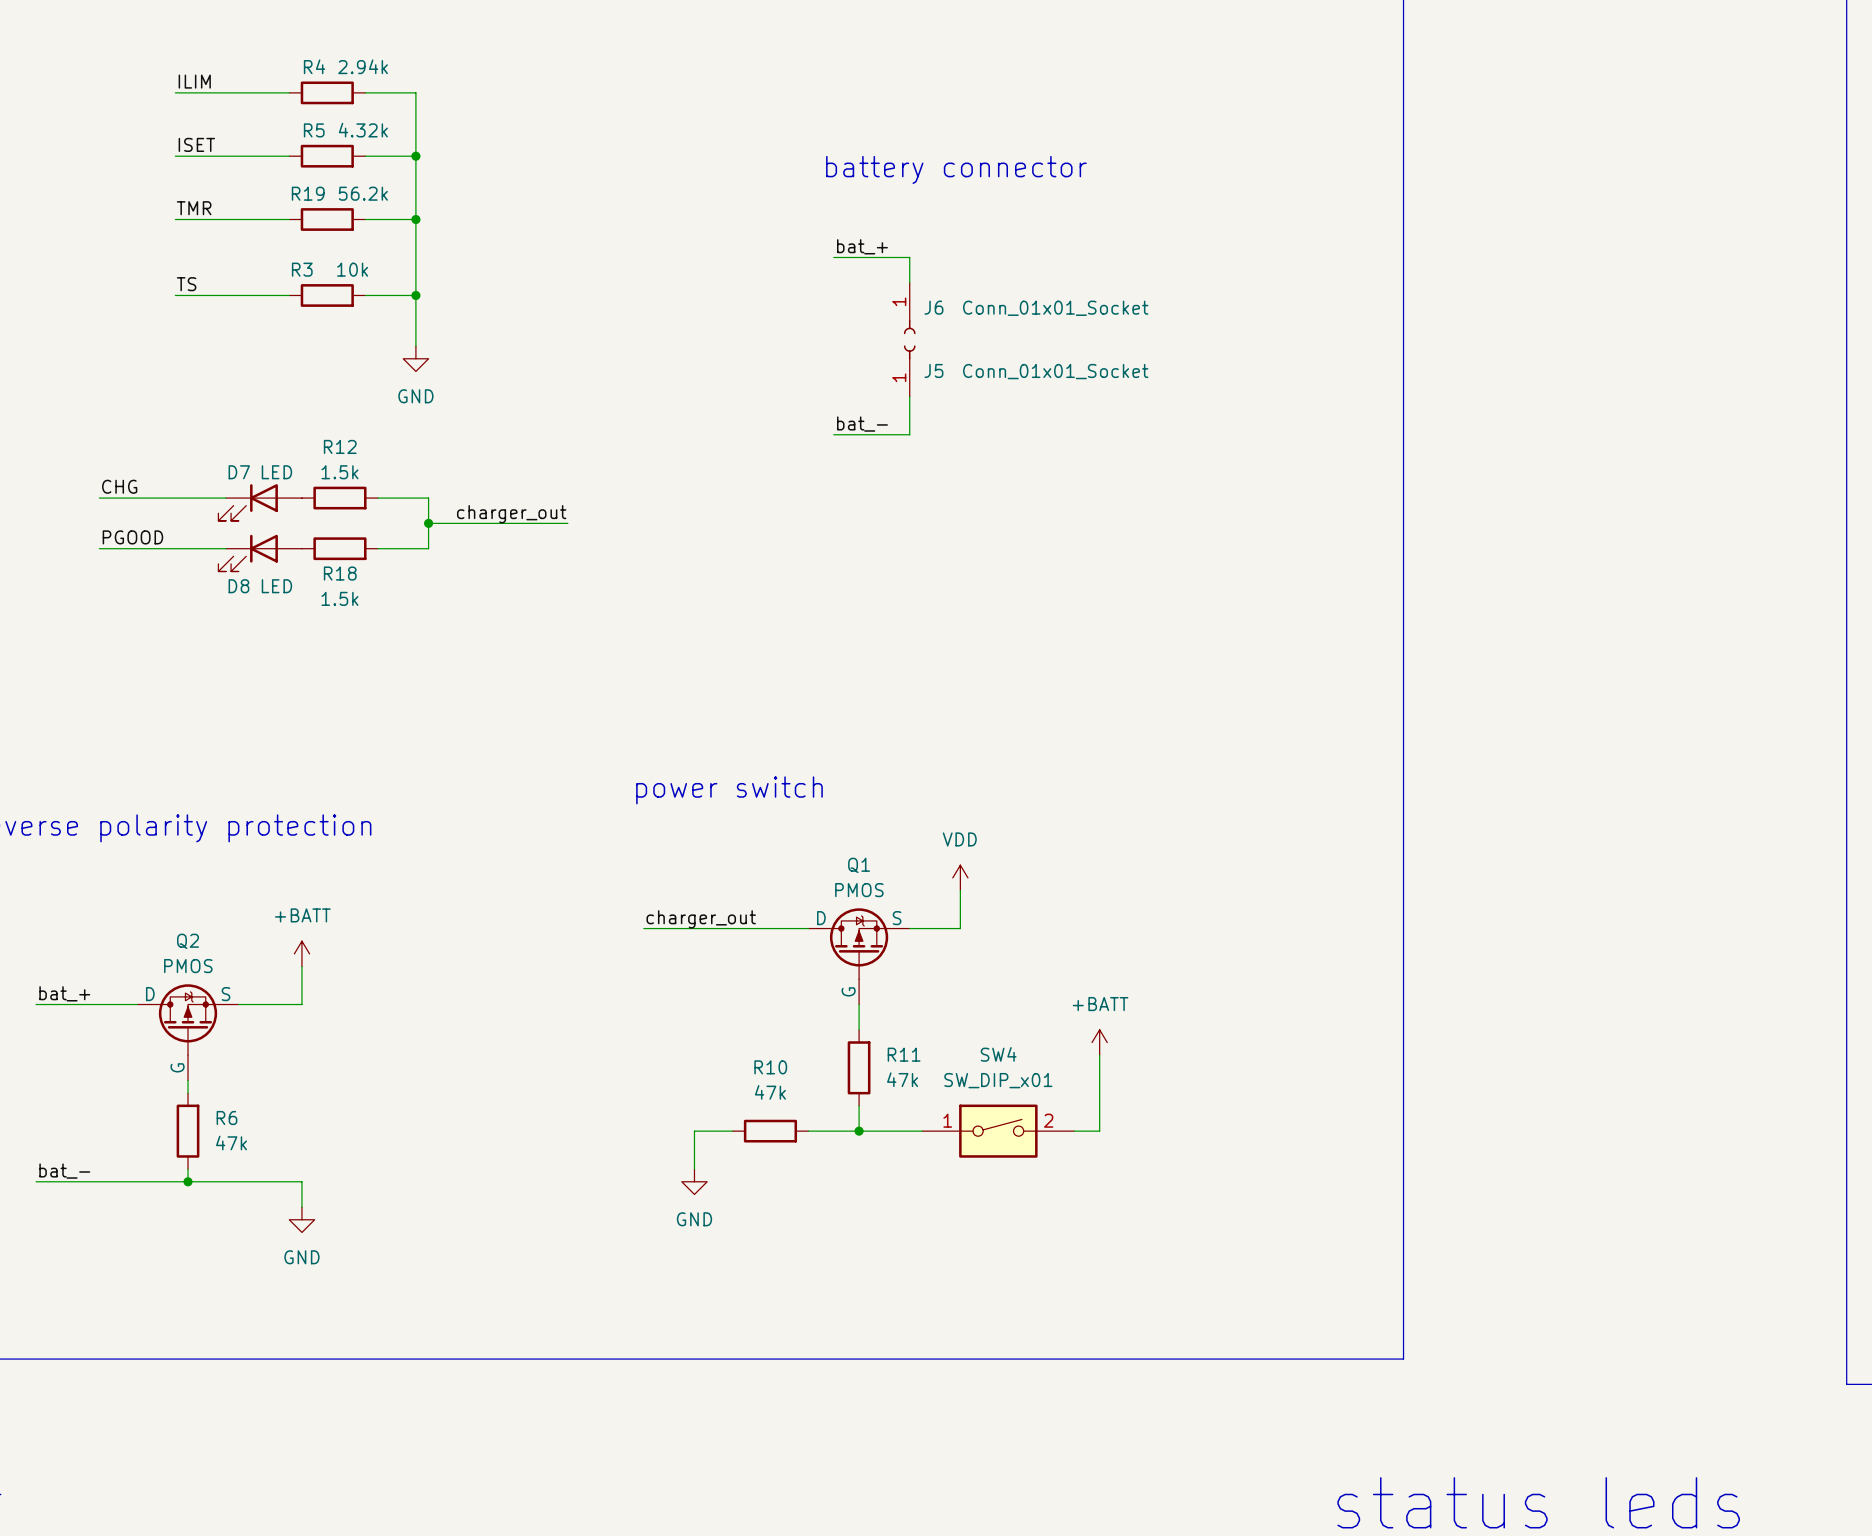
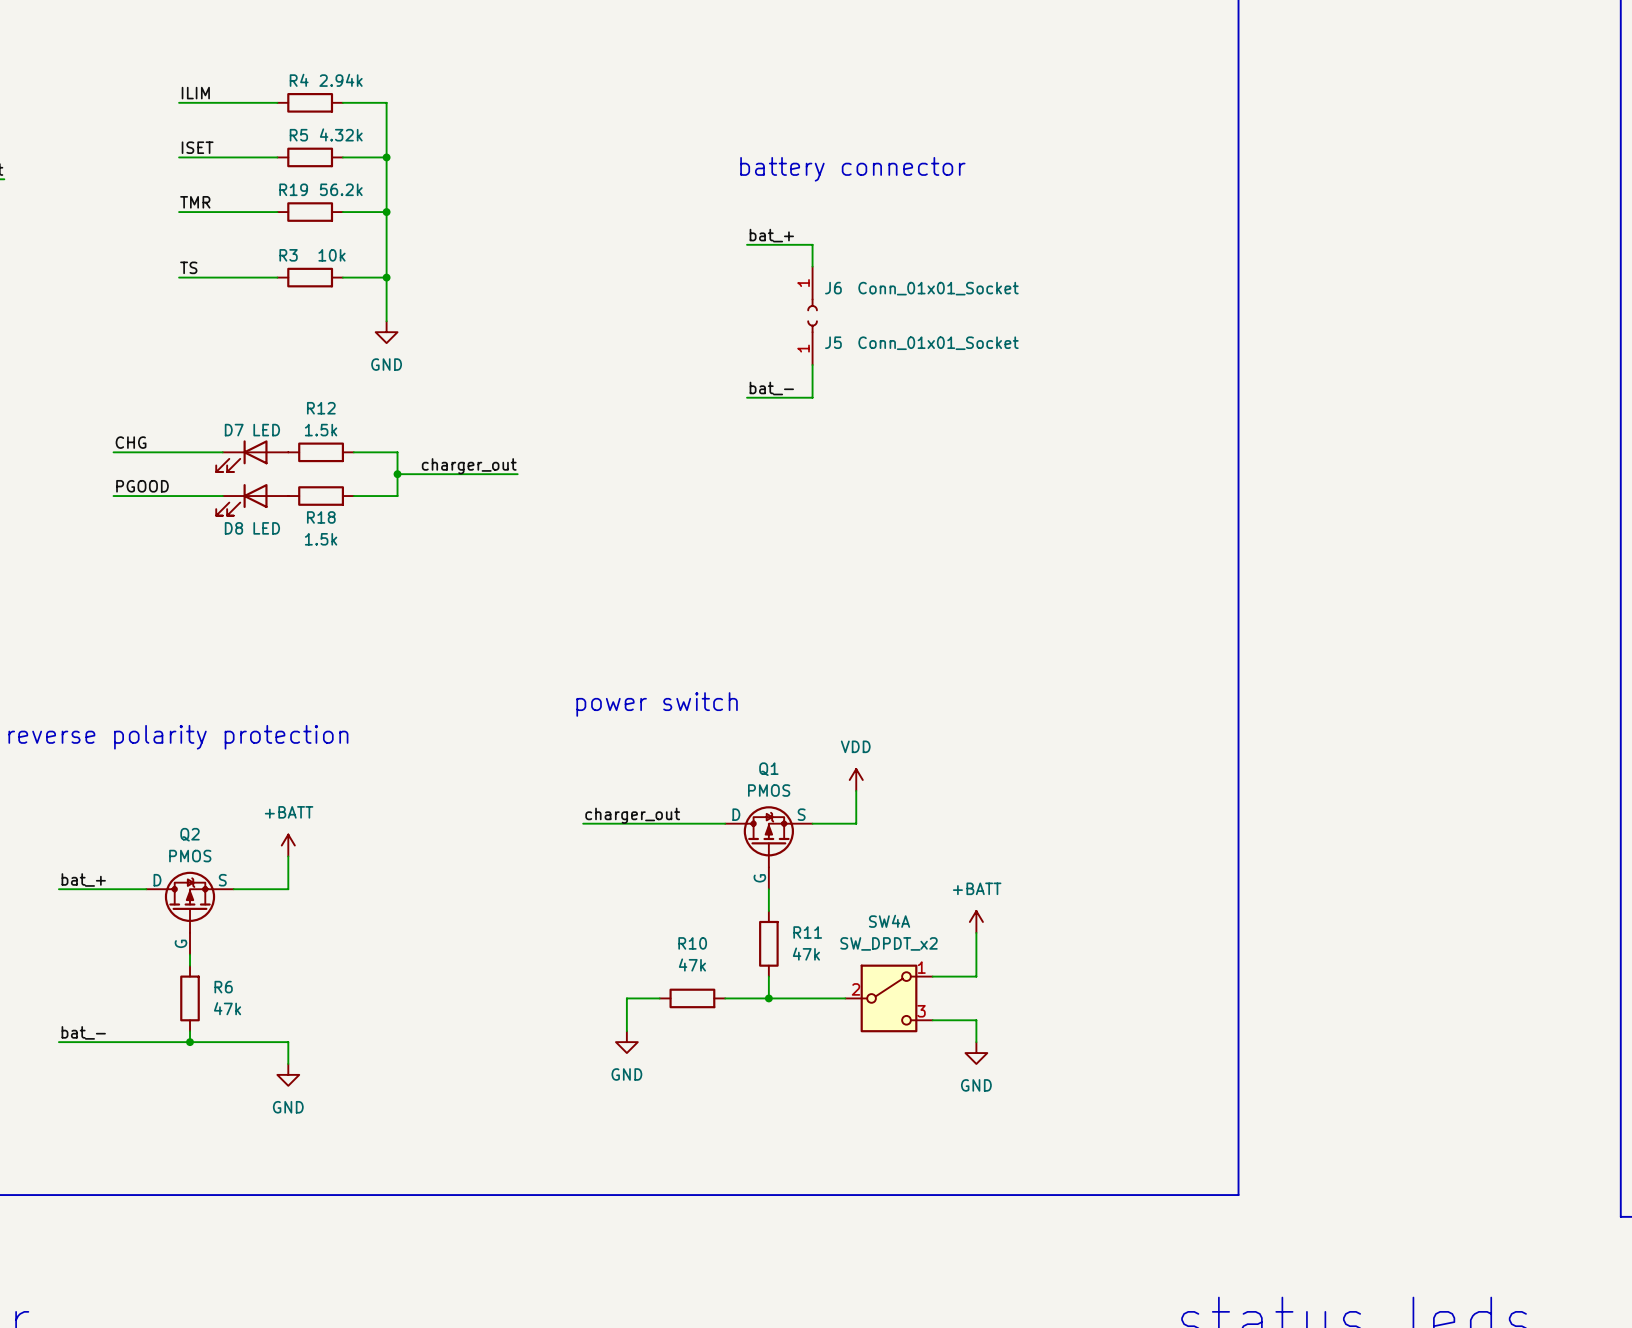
wire: (1099, 1105) (1099, 1131) (1074, 1131) -> (976, 976) (932, 976)
SW4: SW_DIP_x01 (998, 1131) -> none
SW4A: none -> SW_DPDT_x2 (889, 998)
wire: none -> (932, 1020) (976, 1020) (976, 1042)
power symbol: none -> GND (976, 1053)

